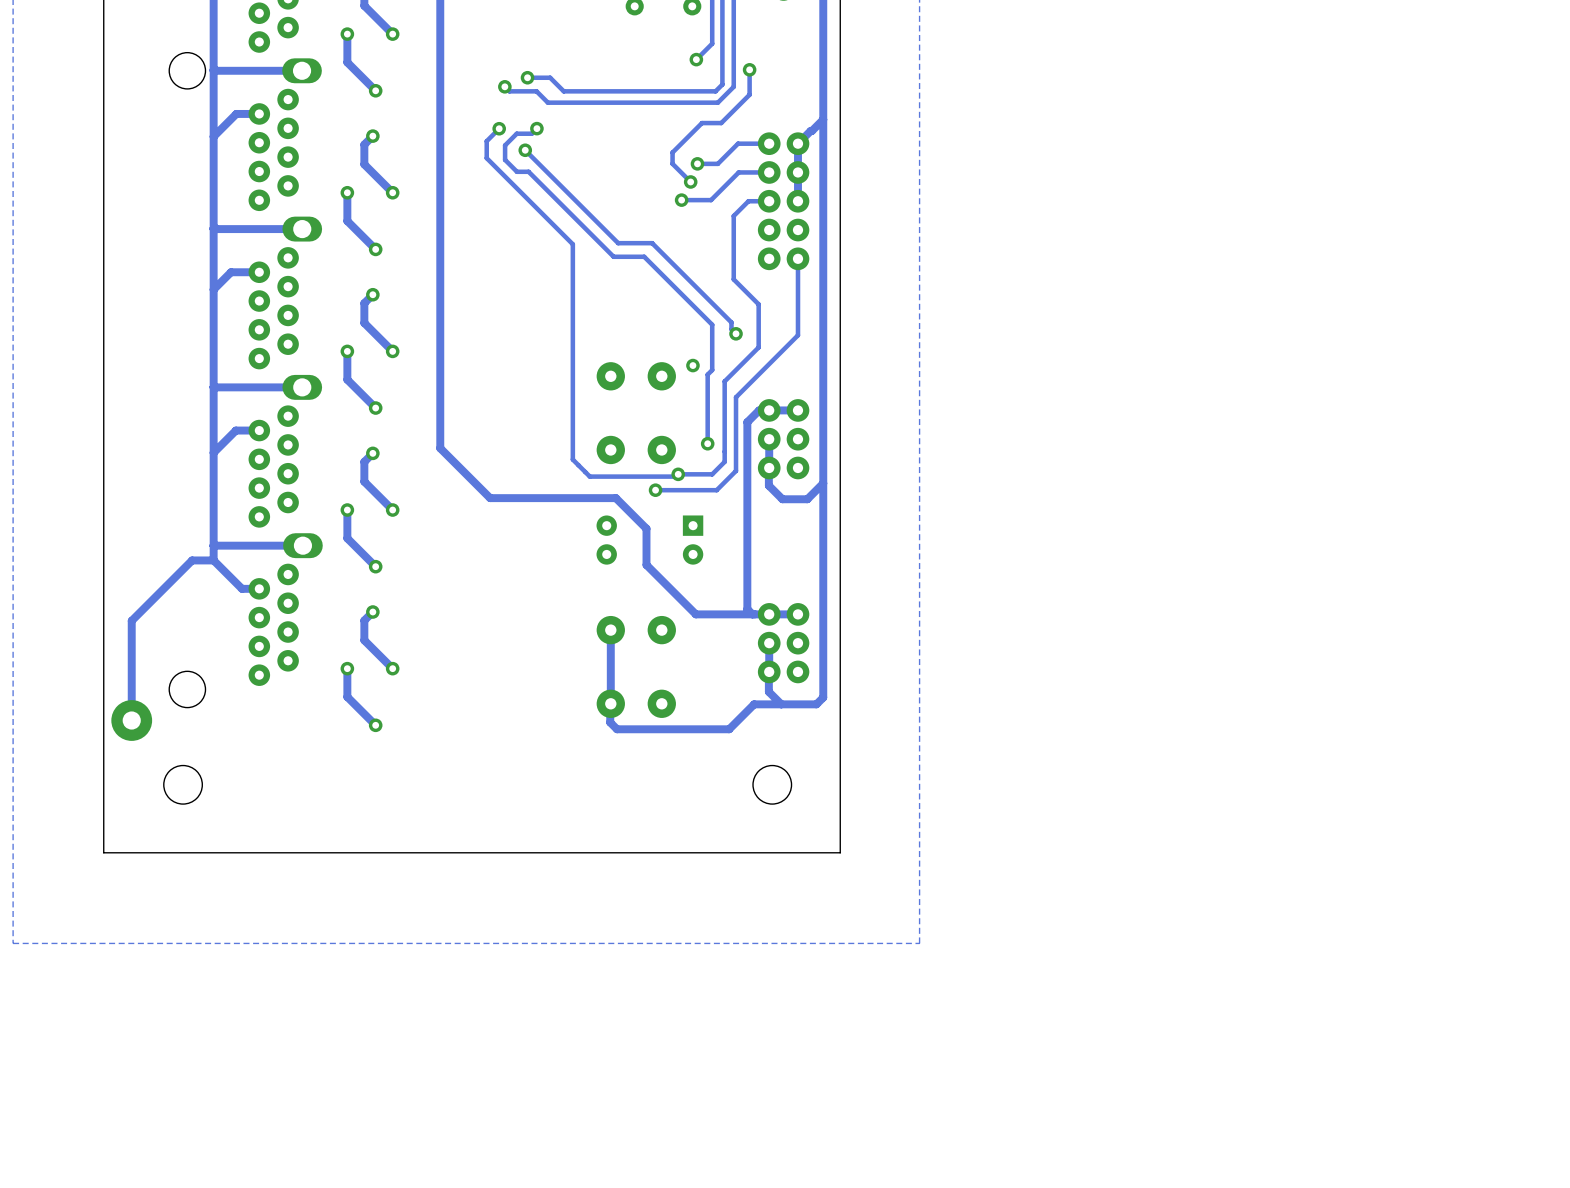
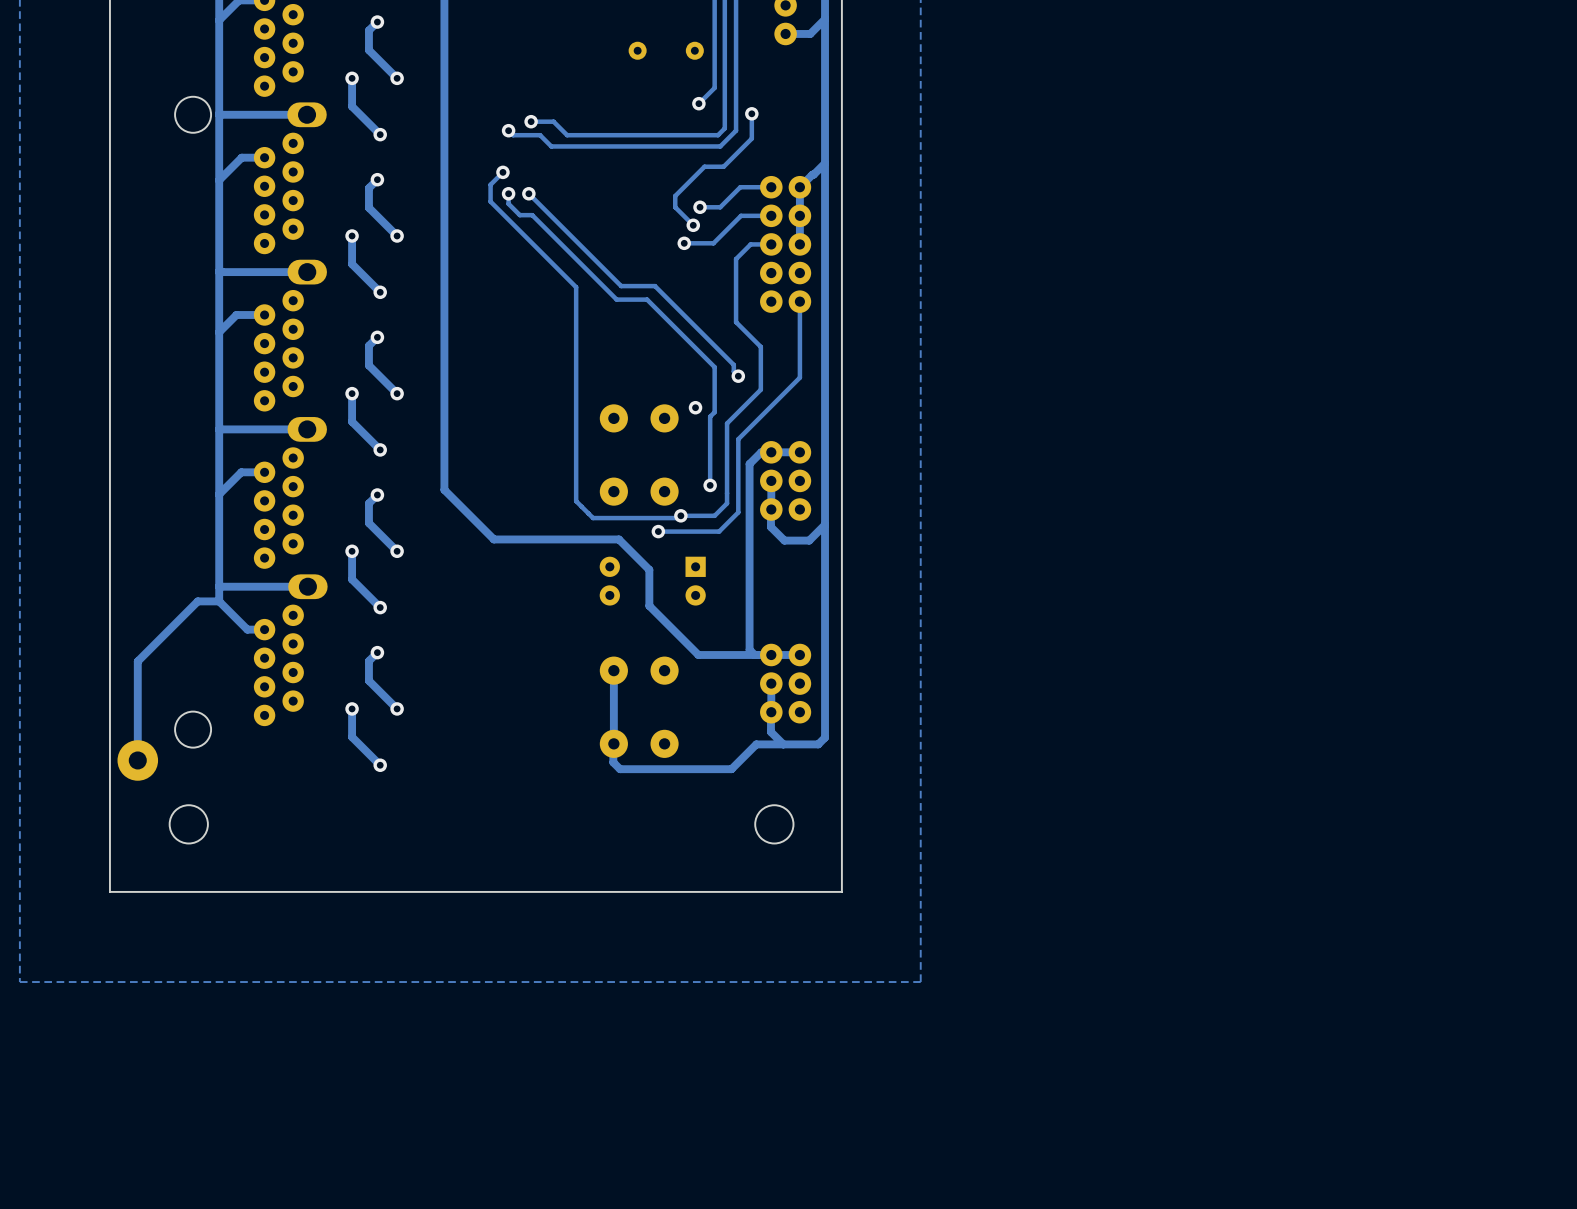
track: (536, 128) (531, 133) (516, 133) (505, 145) (505, 159) (516, 171) -> (508, 193) (508, 203) (520, 215)
via position: (536, 128) -> (508, 193)

